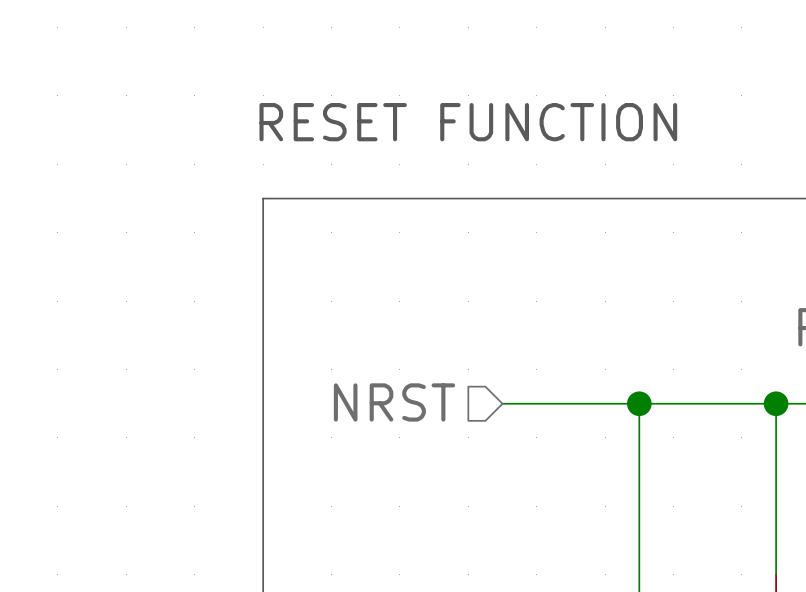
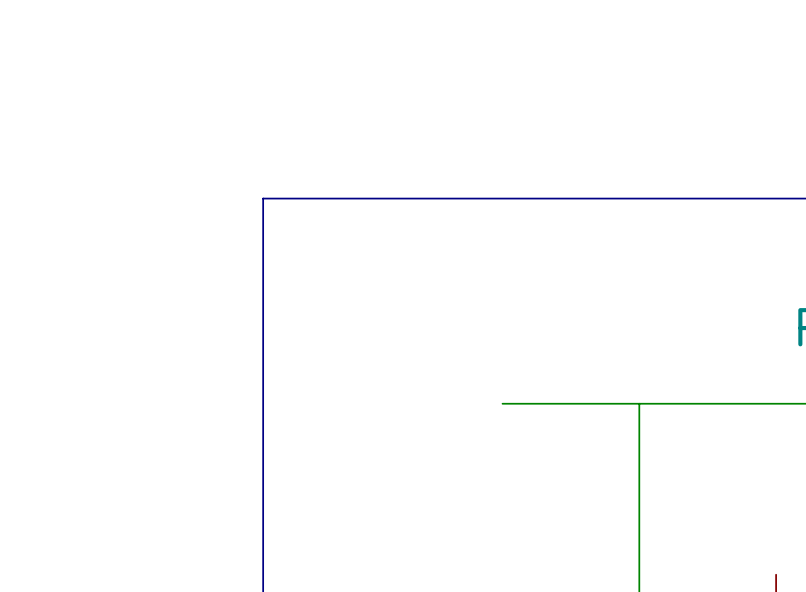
text: RESET FUNCTION (468, 122) -> none
hierarchical label: NRST (394, 402) -> none
junction: (639, 403) -> none
wire: (776, 403) (776, 574) -> none
junction: (776, 403) -> none

